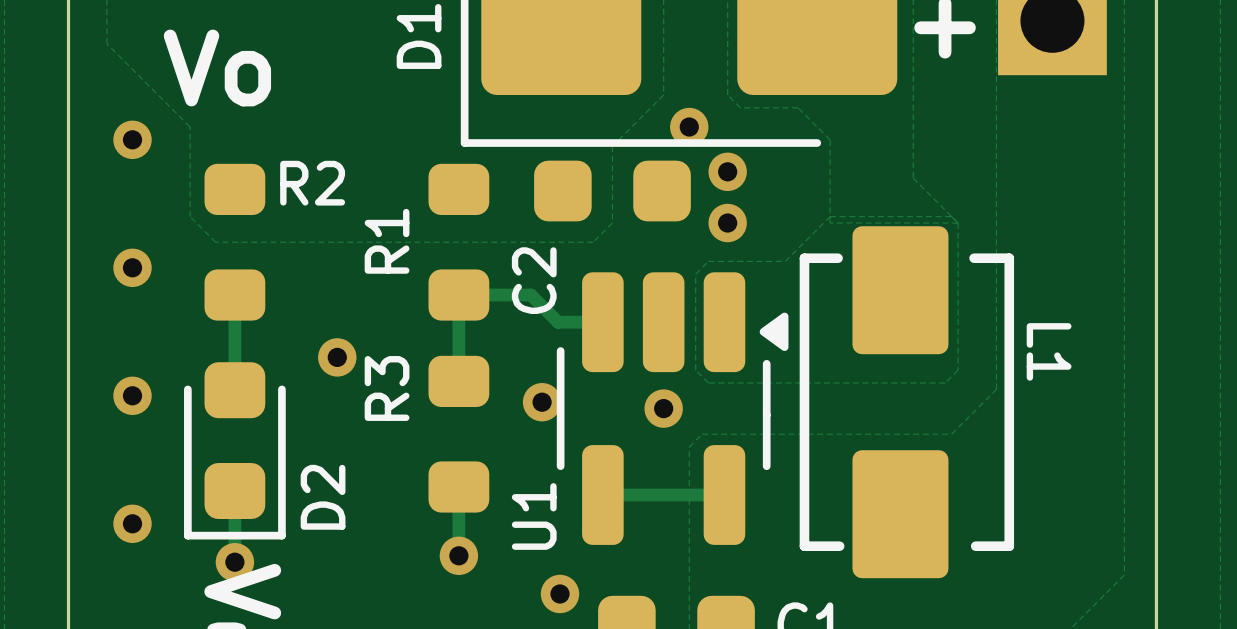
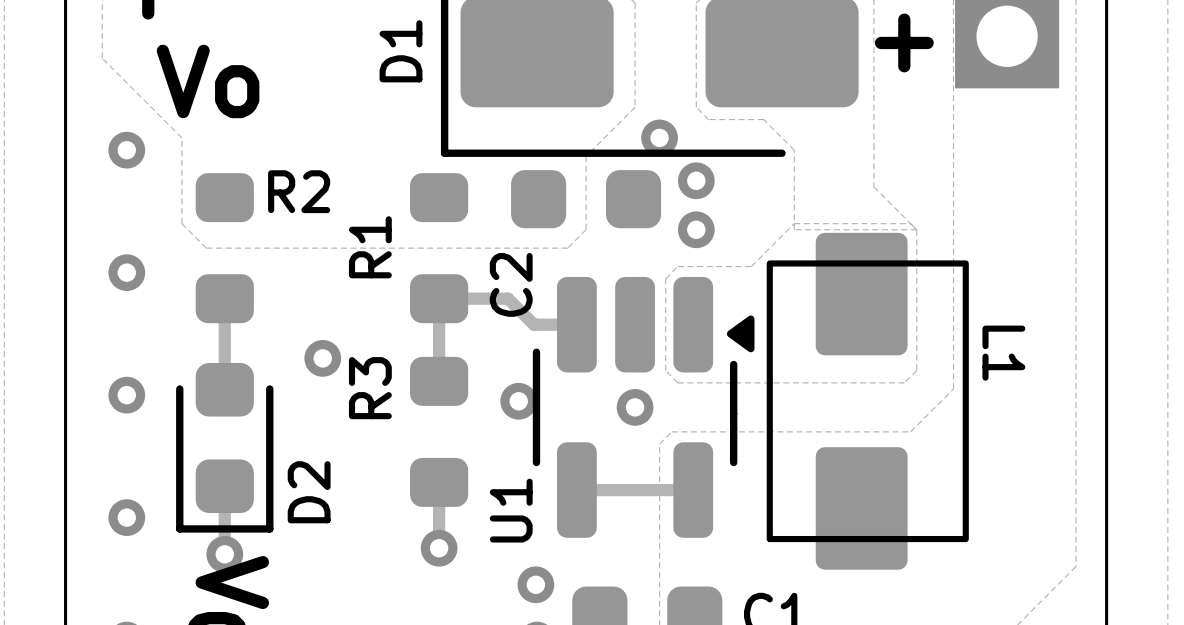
L1 footprint: [799, 226, 1015, 579] -> [766, 232, 969, 570]

